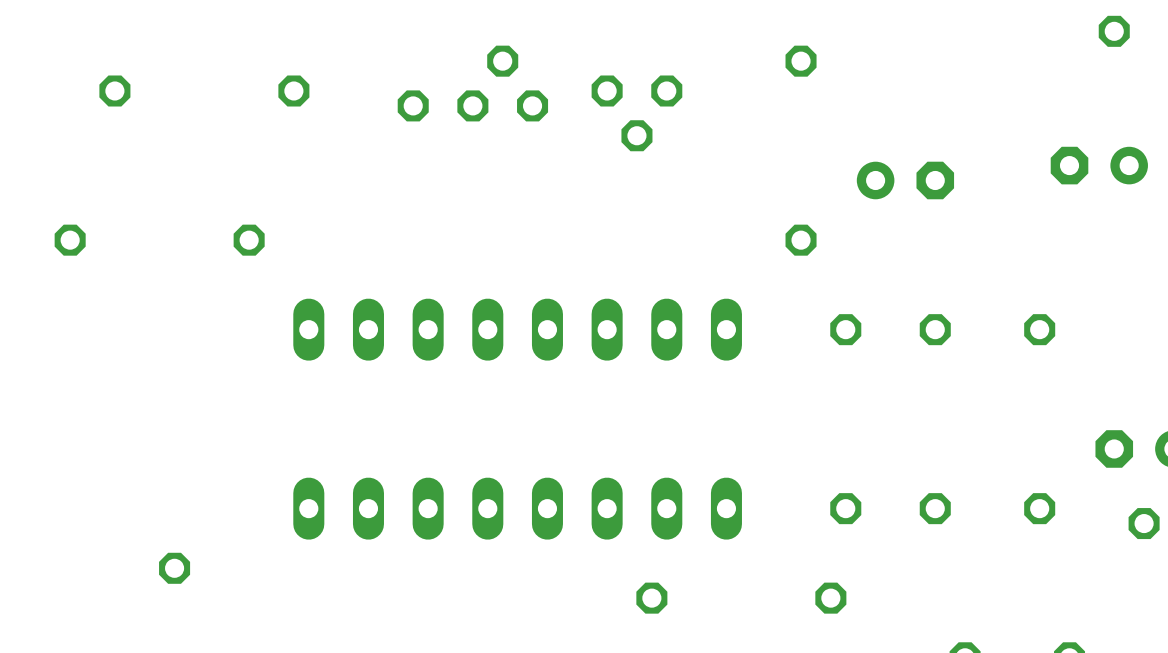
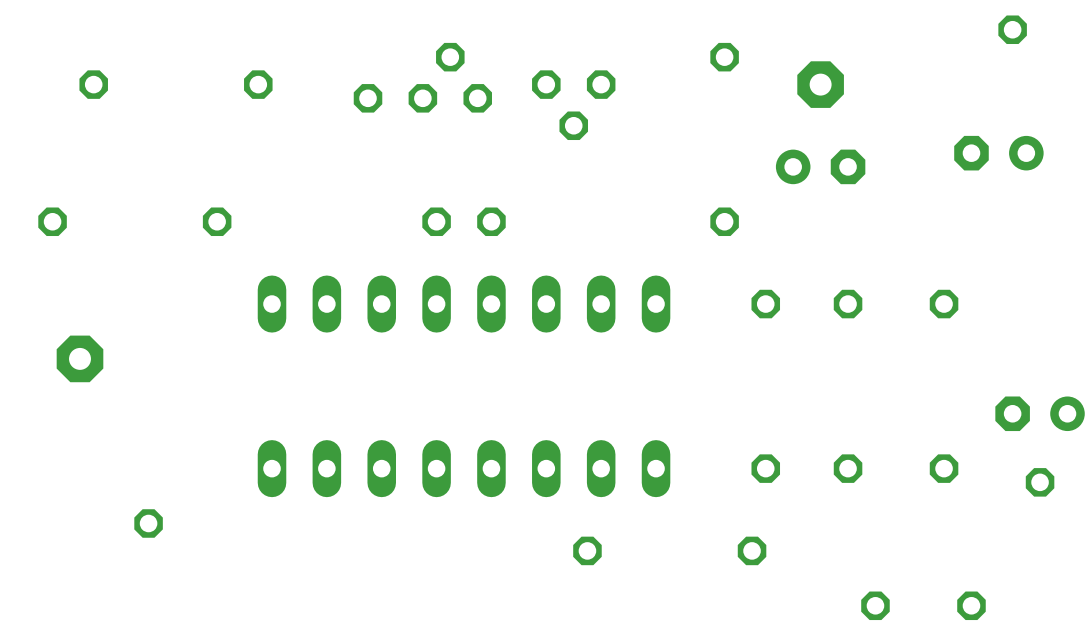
part: none -> (820, 84)
part: none -> (464, 221)
part: none -> (79, 358)

